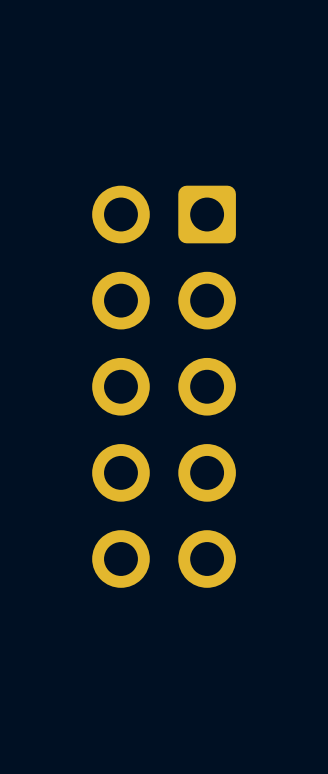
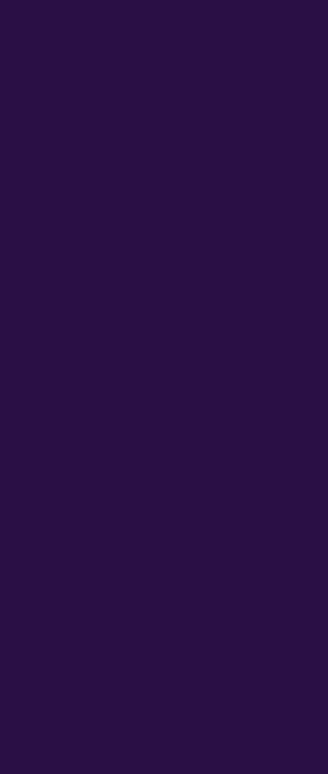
part: (164, 386) -> none

